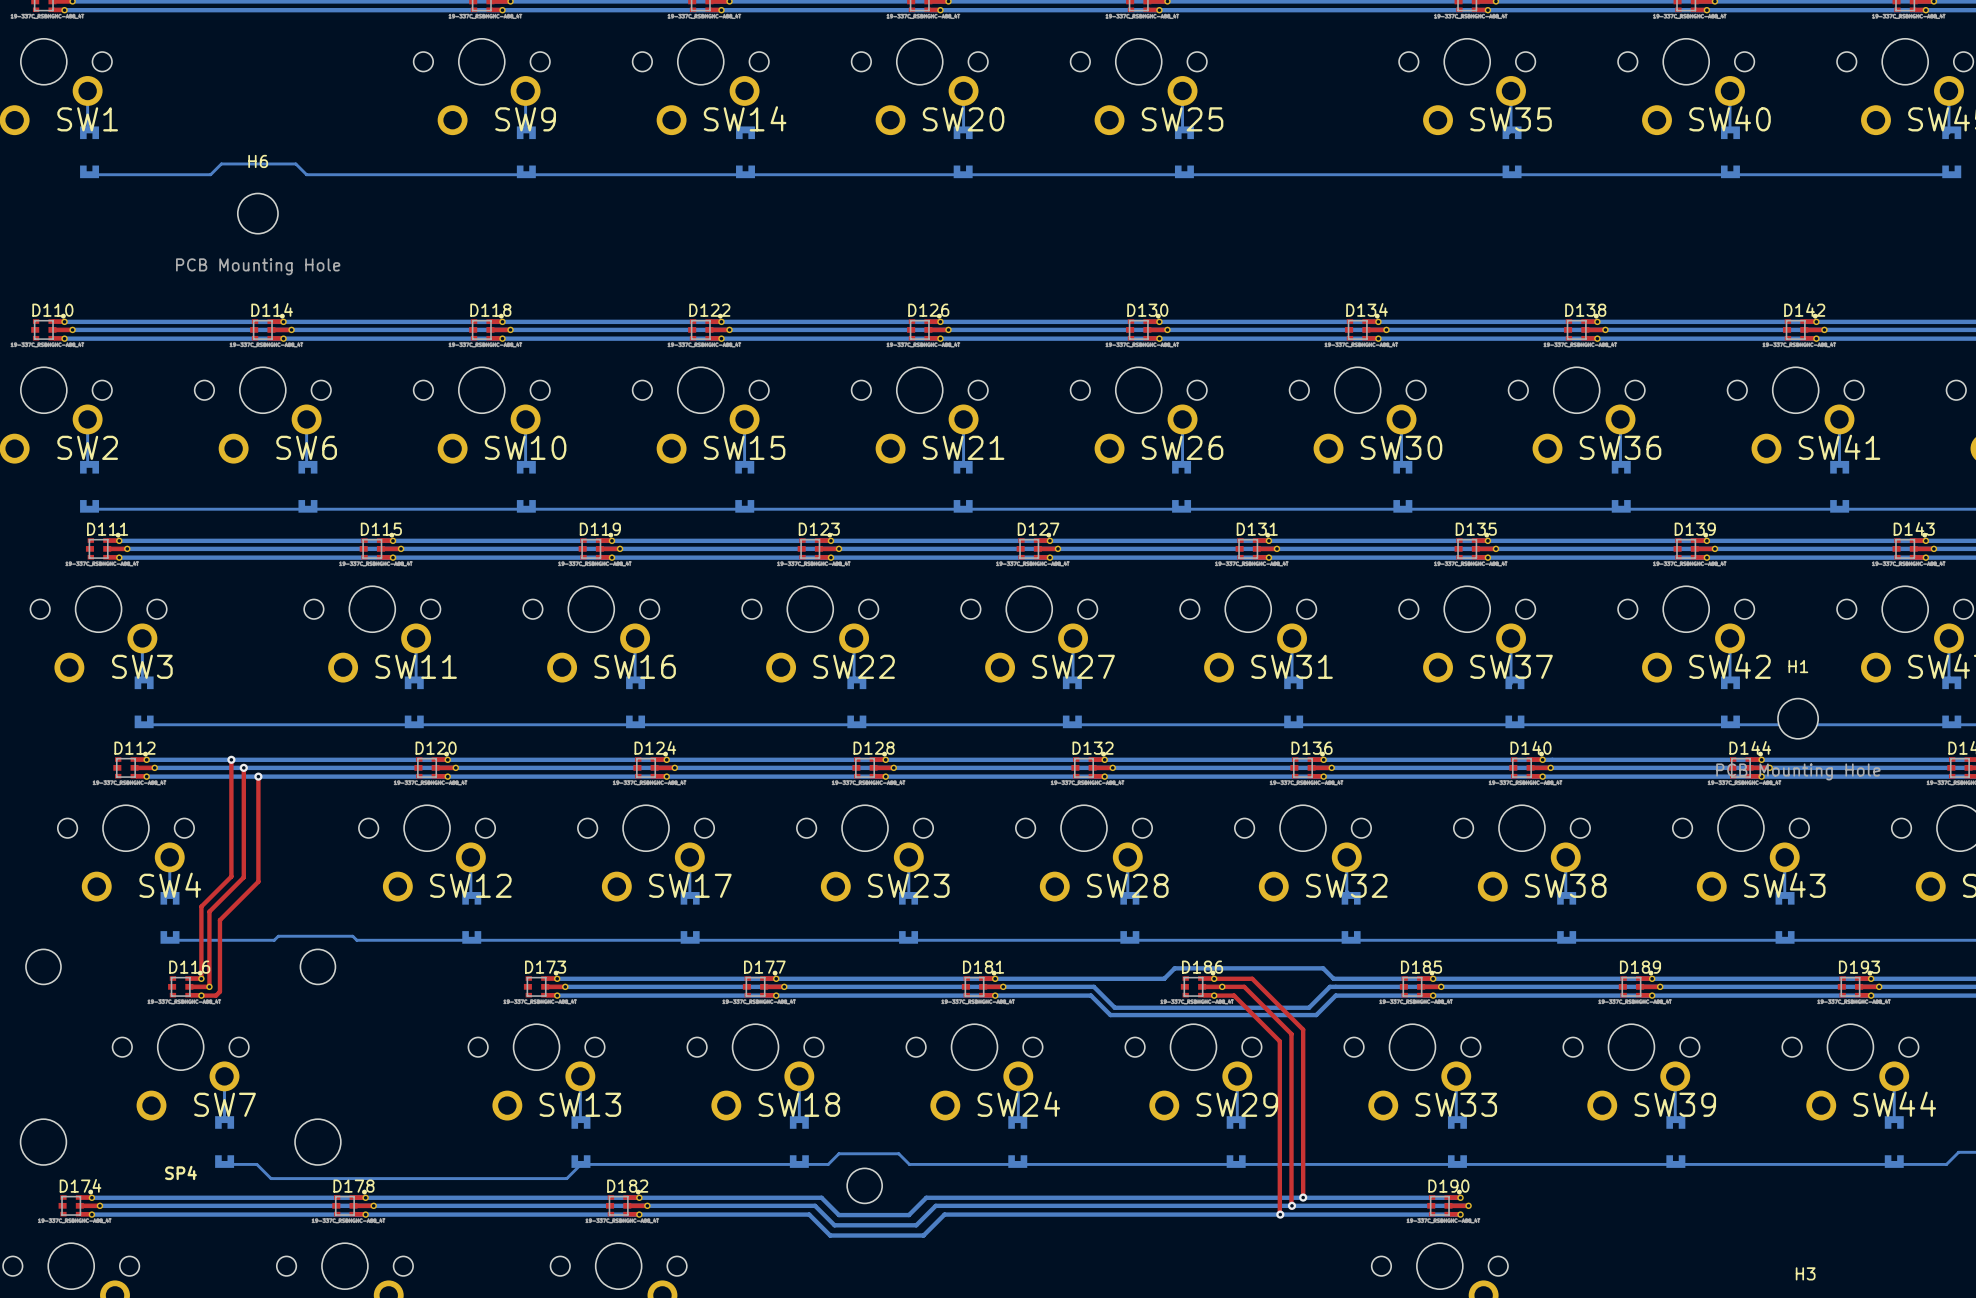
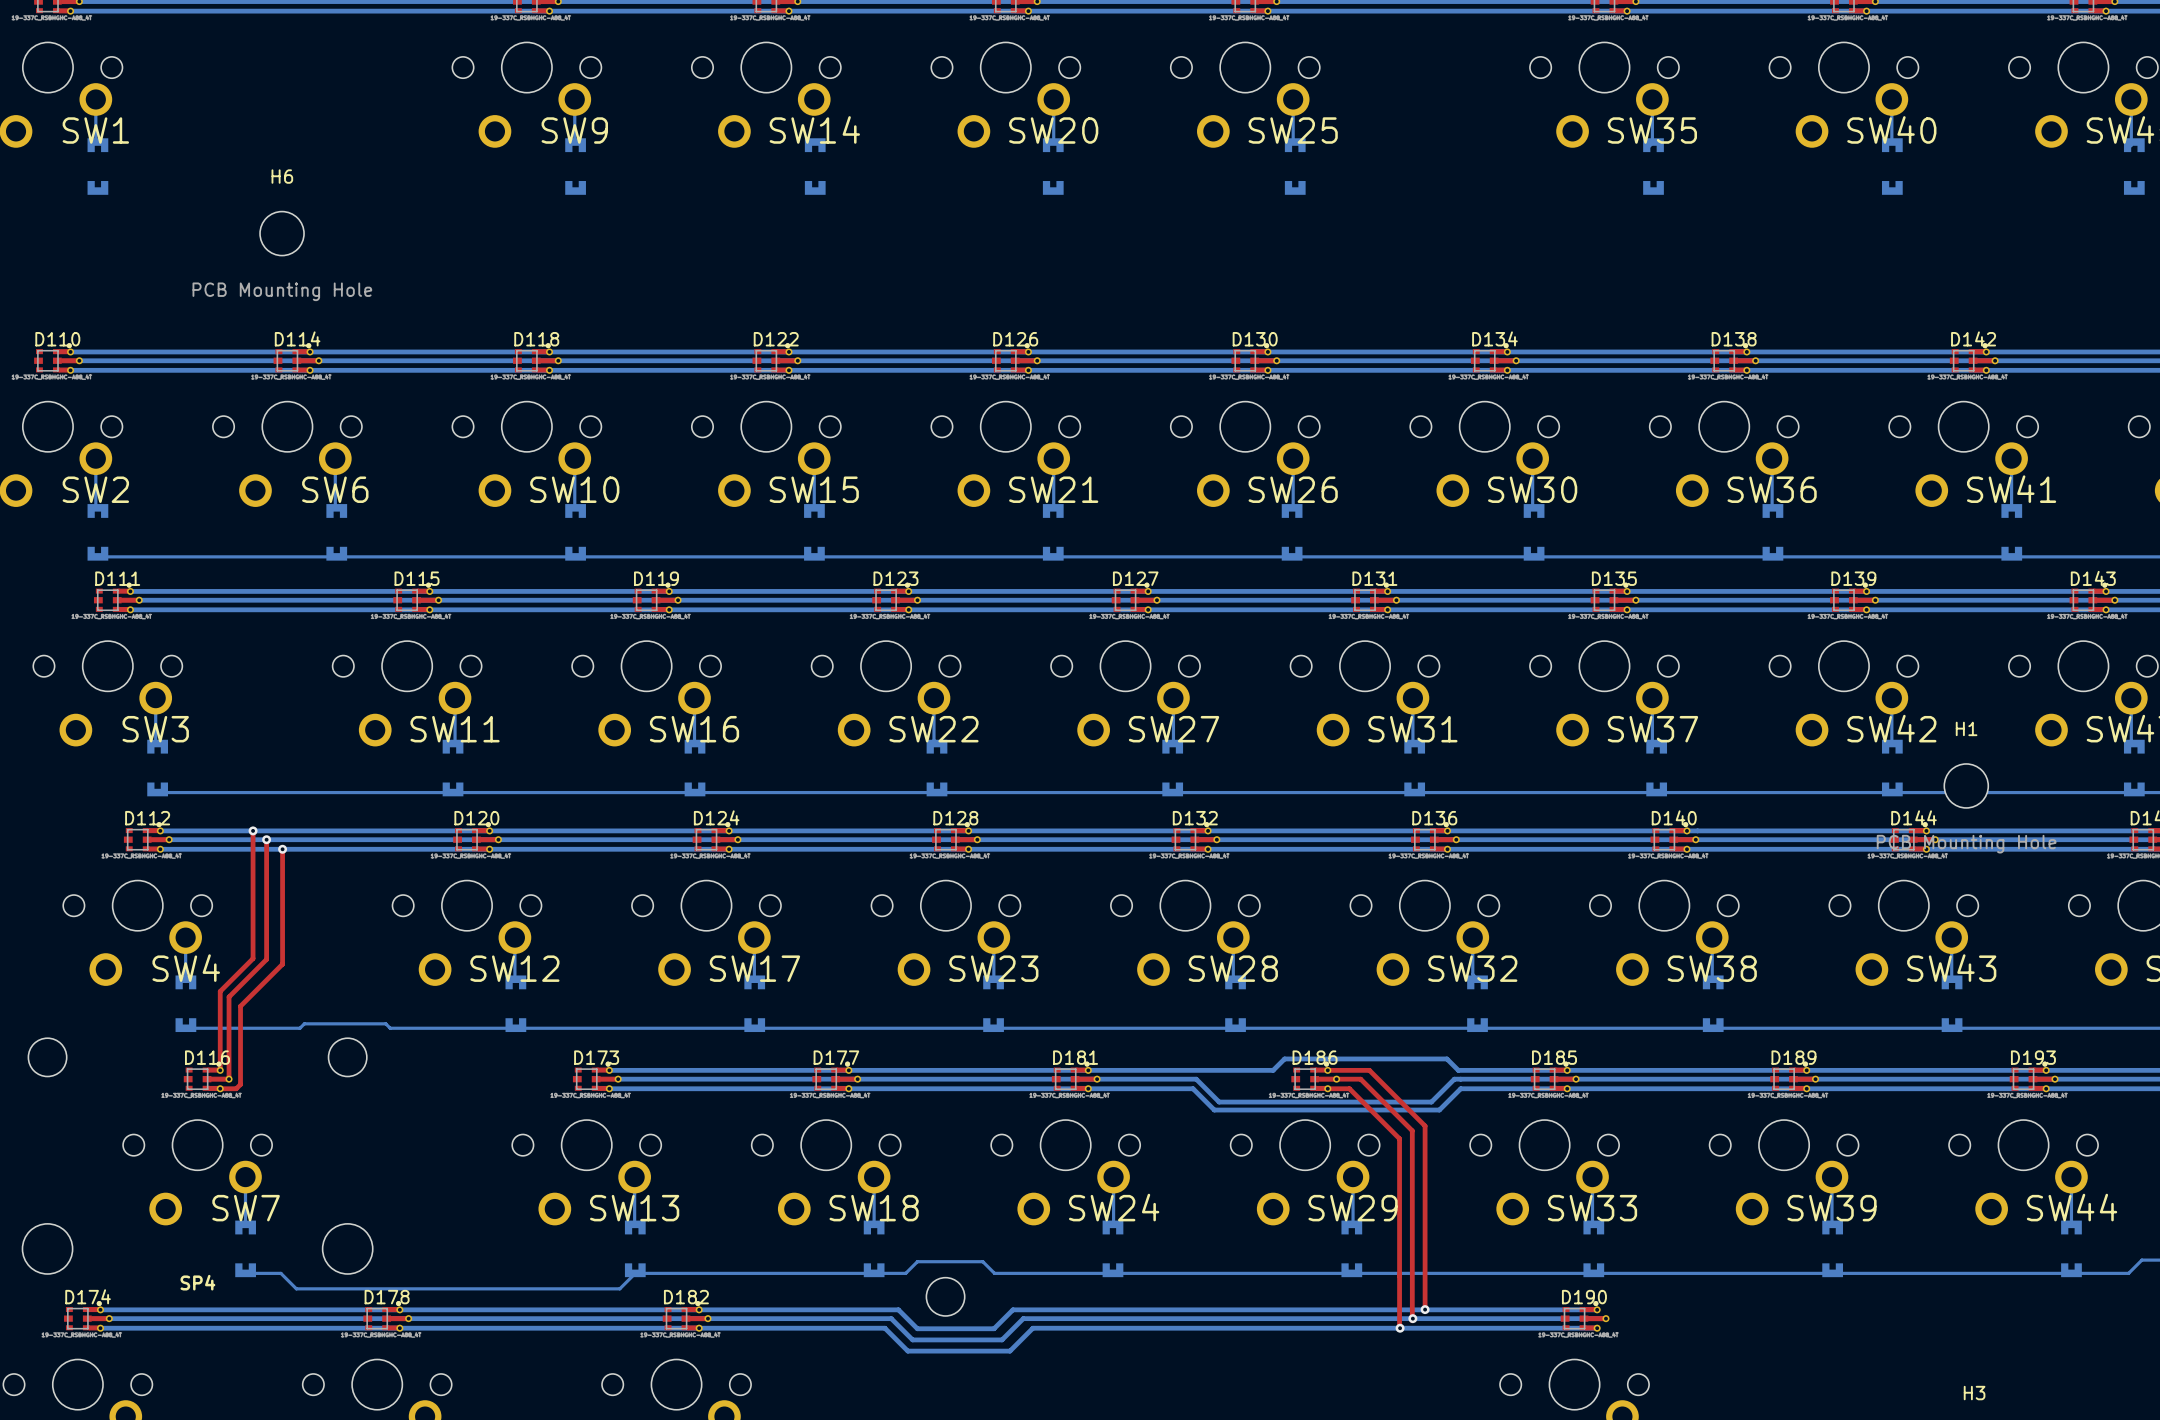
bottom track: (89, 174) (210, 174) (221, 163) (295, 163) (306, 174) (1951, 174) -> none

